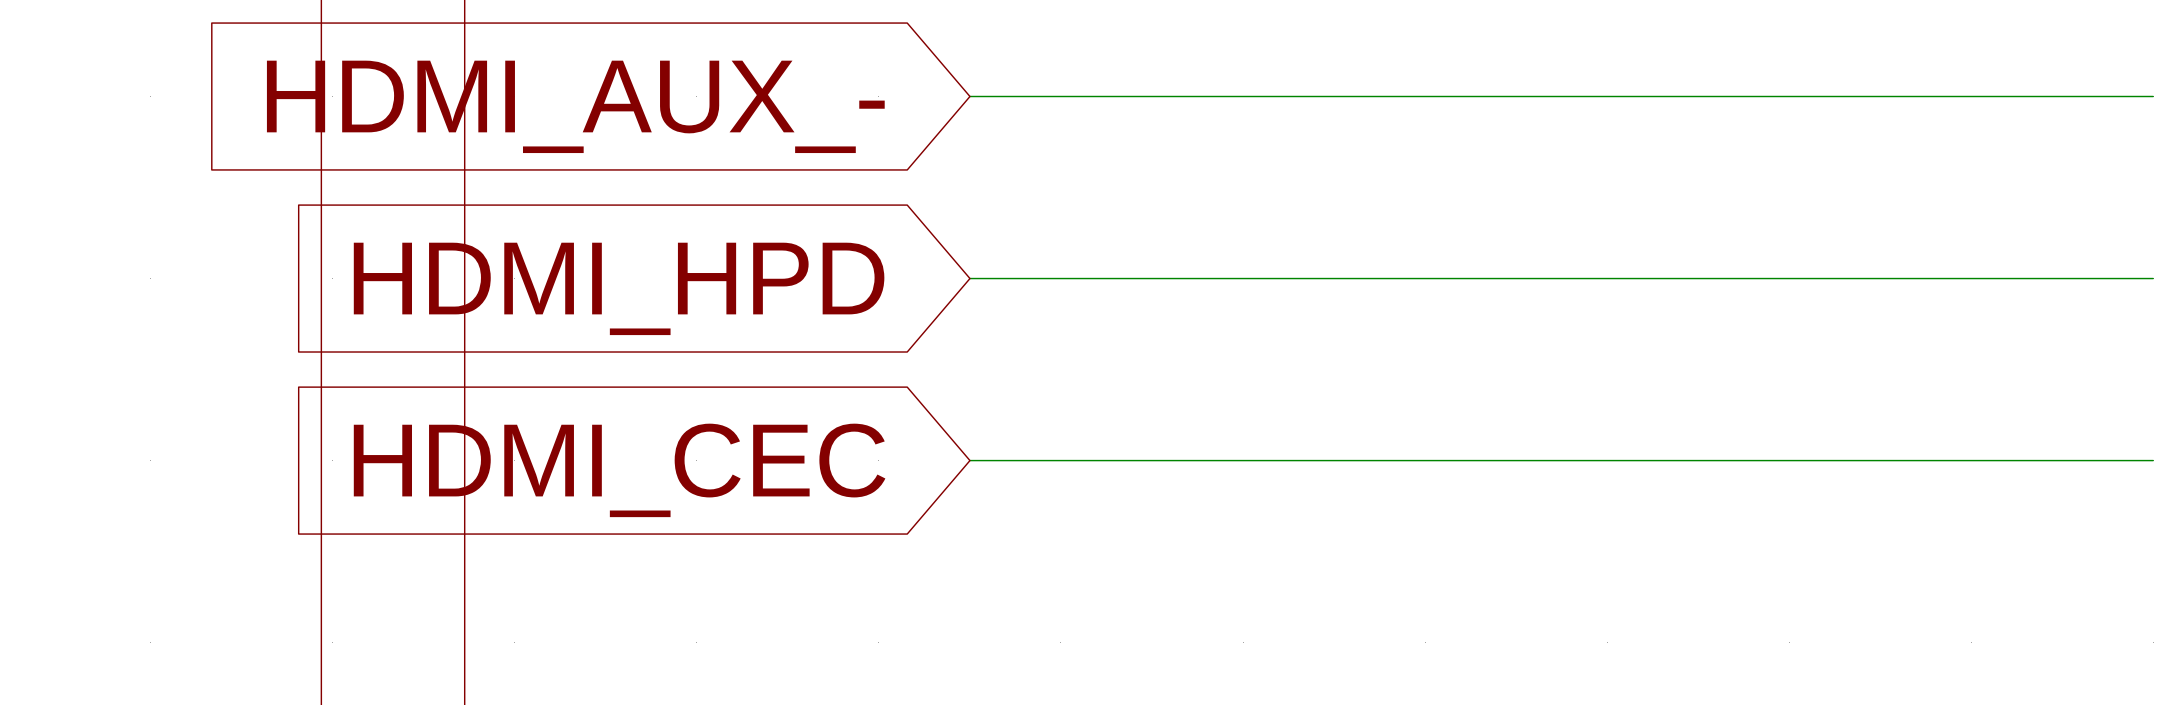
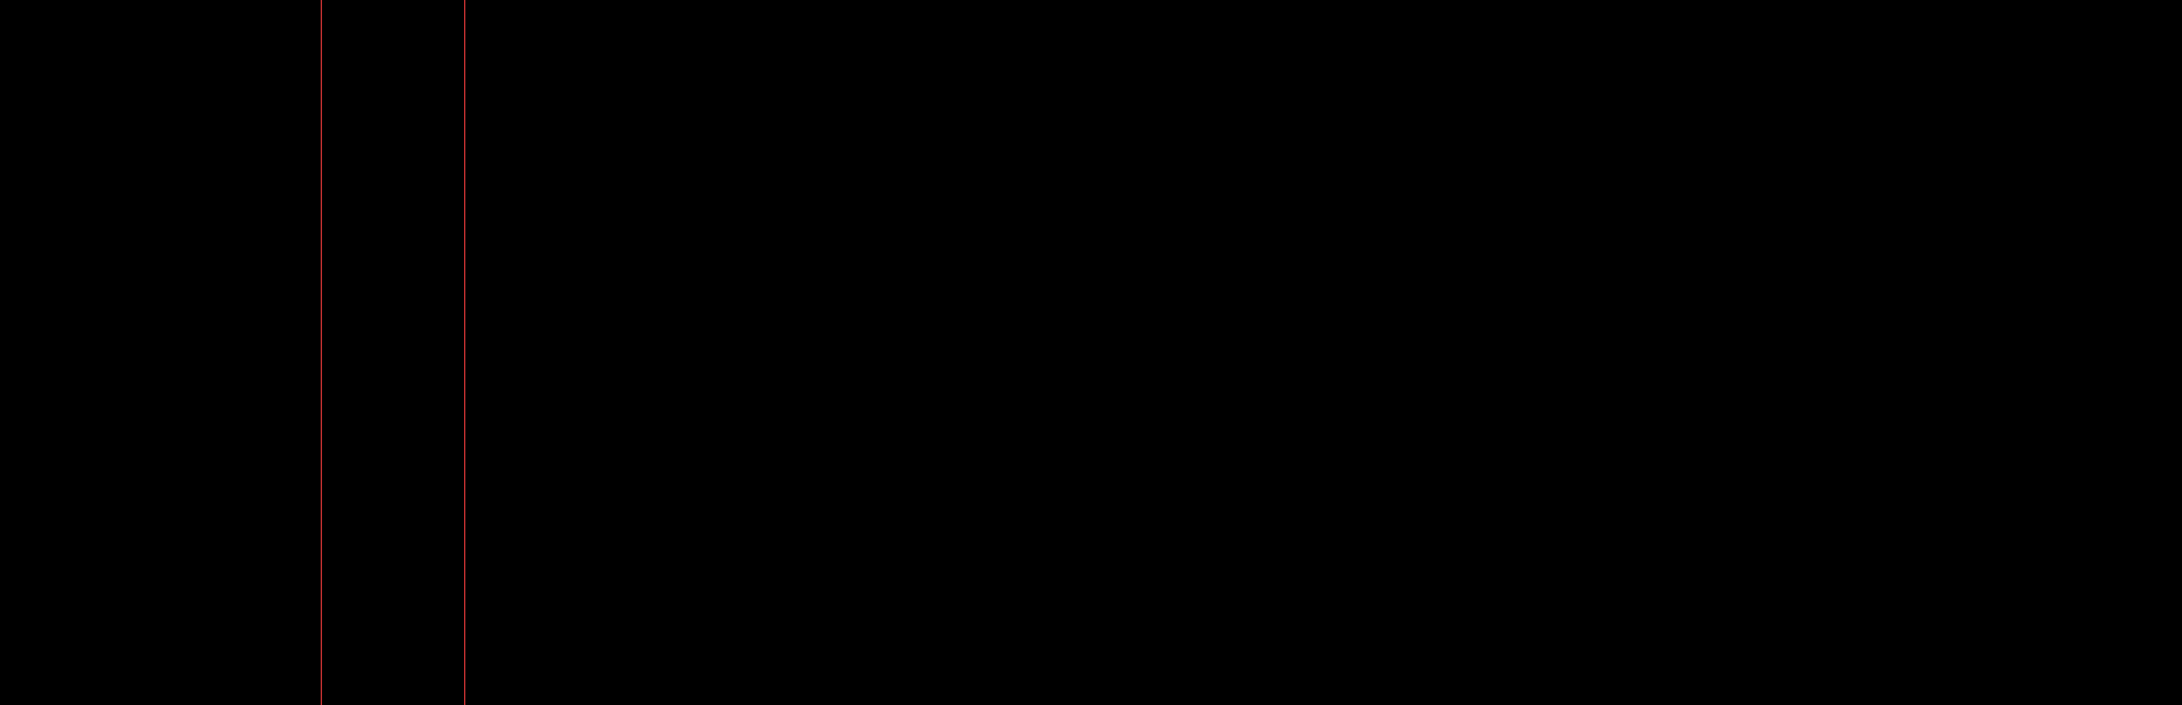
wire: (969, 96) (2153, 96) -> none
global label: HDMI_AUX_- (575, 106) -> none
wire: (969, 278) (2153, 278) -> none
global label: HDMI_HPD (619, 288) -> none
wire: (969, 460) (2153, 460) -> none
global label: HDMI_CEC (619, 470) -> none

